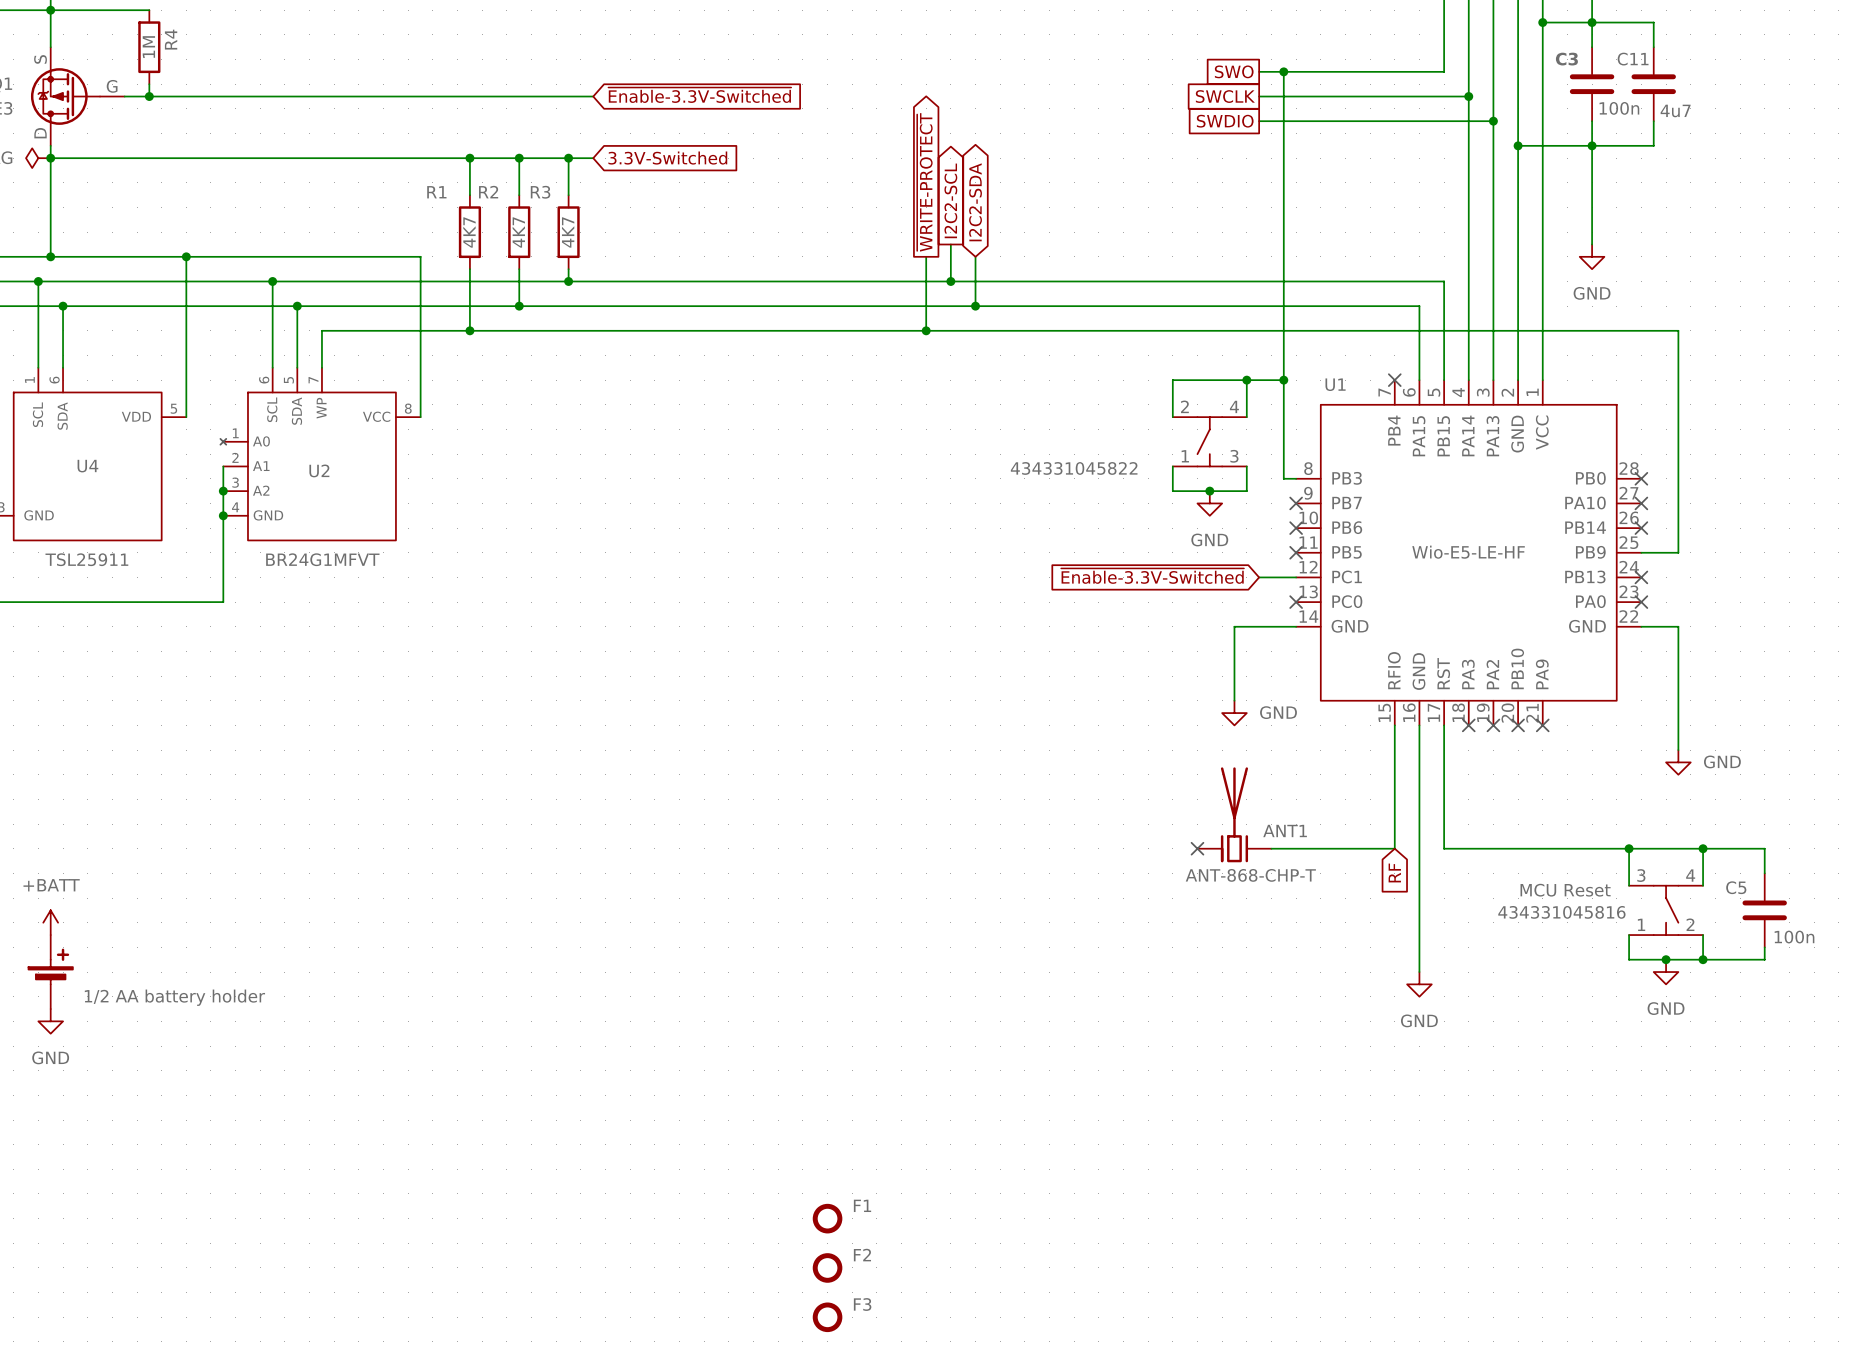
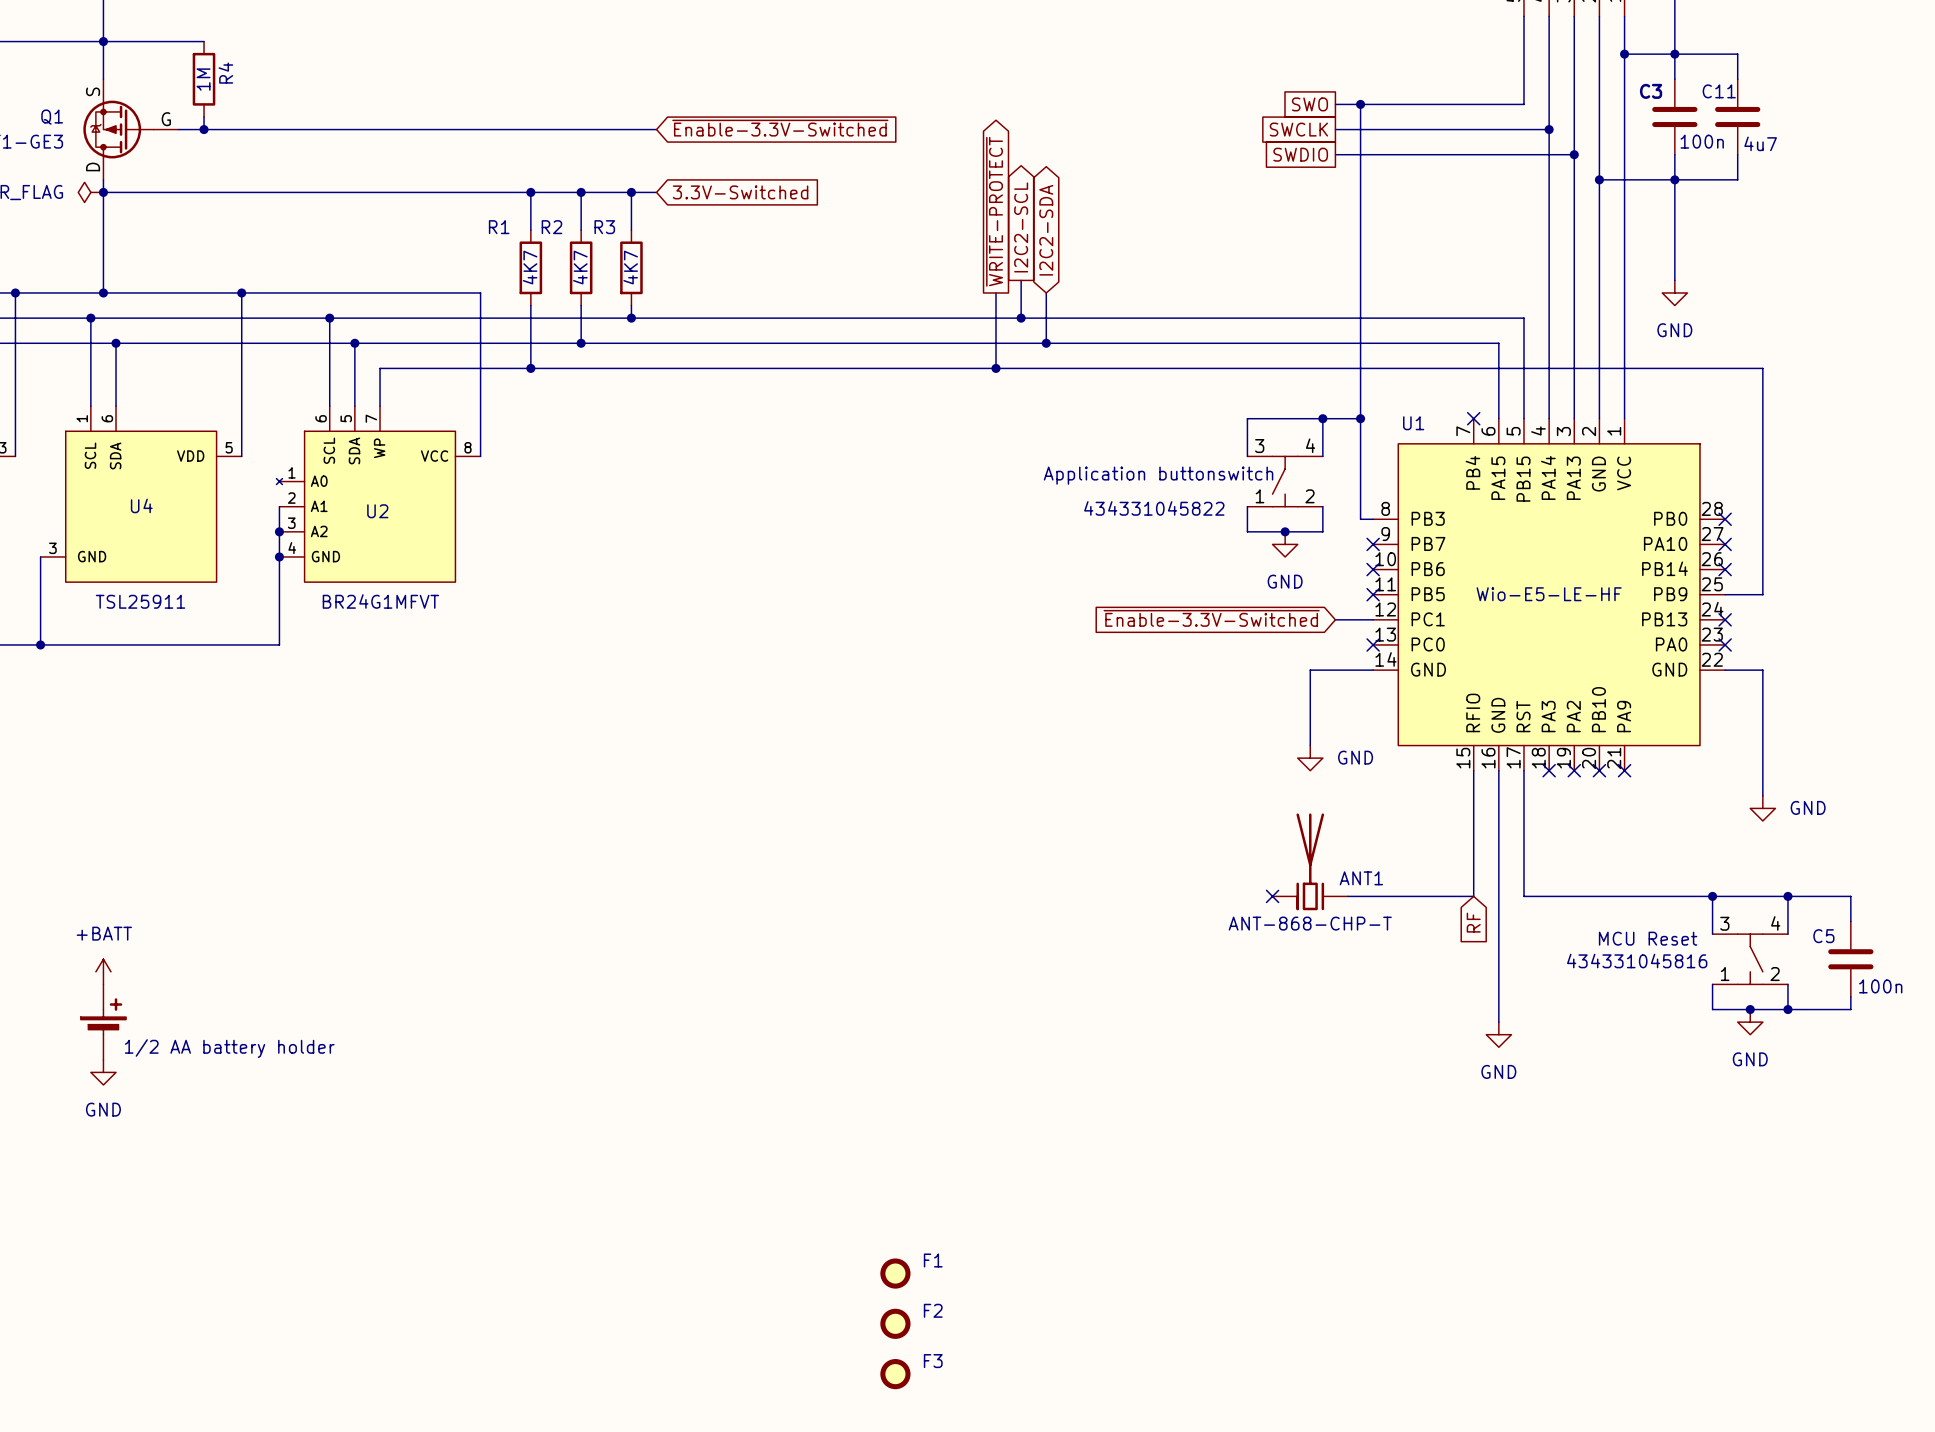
part pin number: 2 (1184, 406) -> 3 (1259, 446)
part text: none -> Application buttonswitch (1158, 475)
part pin number: 3 (1234, 456) -> 2 (1309, 496)

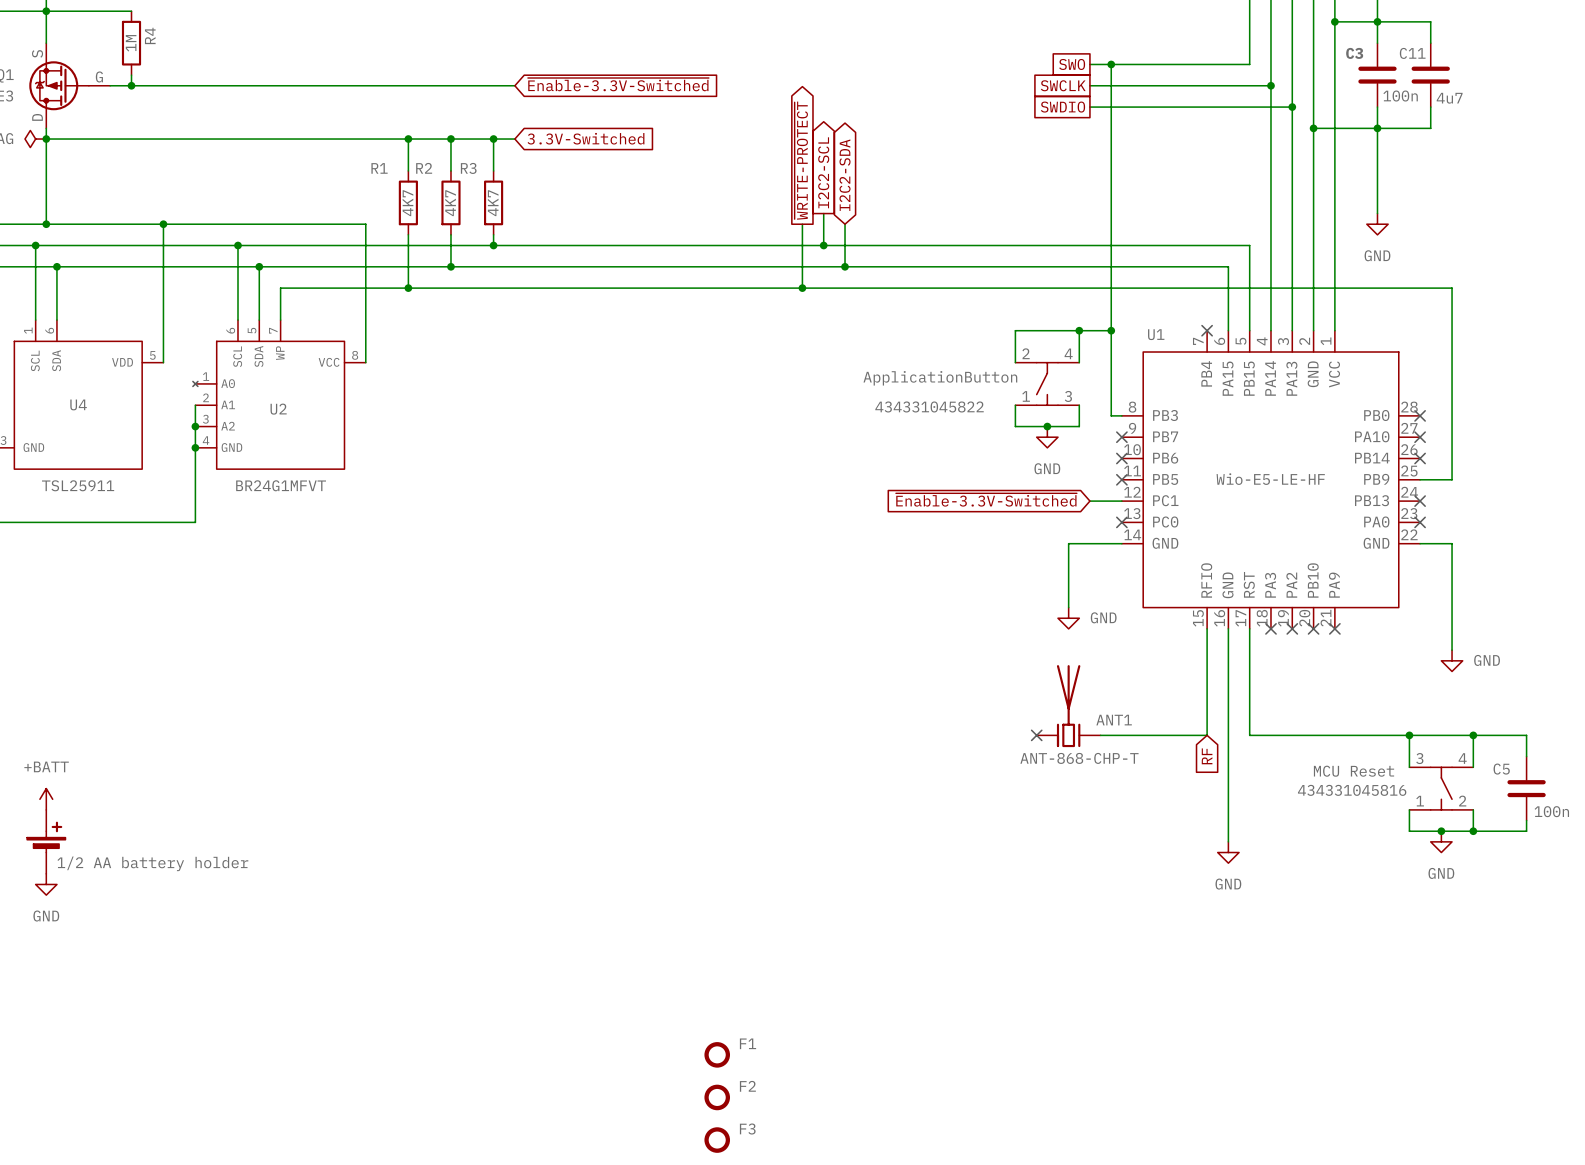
part pin number: 3 (1259, 446) -> 2 (1026, 353)
part text: Application buttonswitch (1158, 475) -> ApplicationButton (940, 378)
part pin number: 2 (1309, 496) -> 3 (1068, 396)

